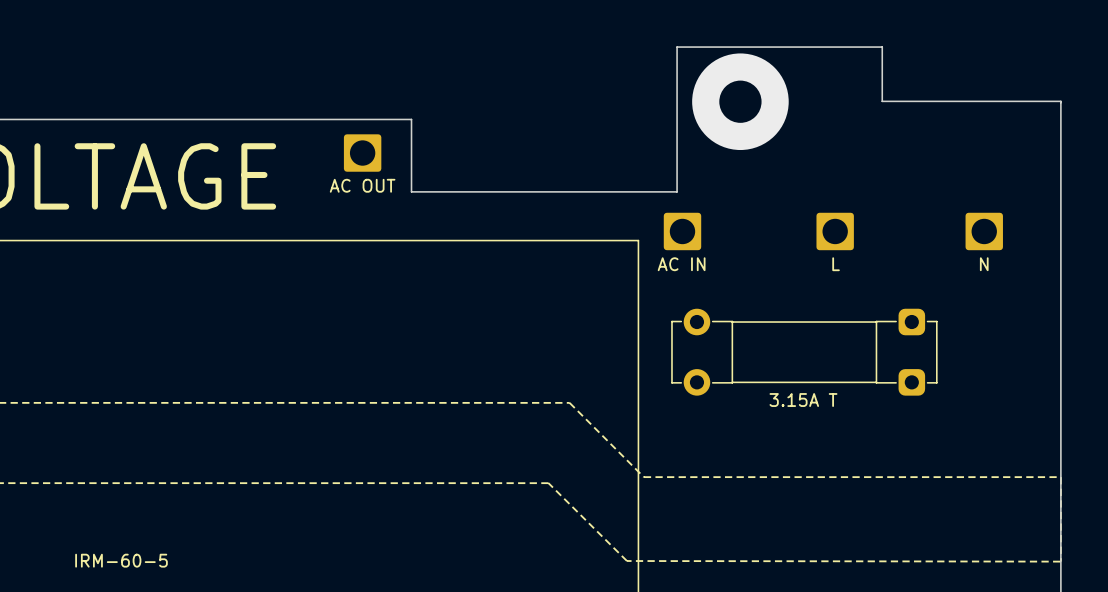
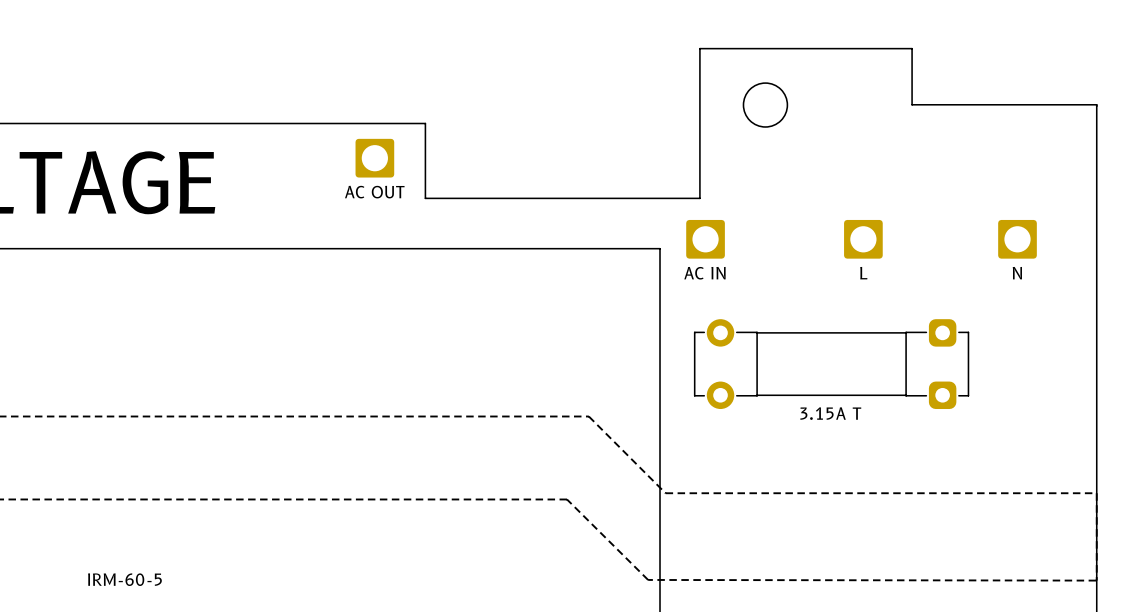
round board edge: none -> [742, 82, 789, 128]
via: (740, 101) -> none

